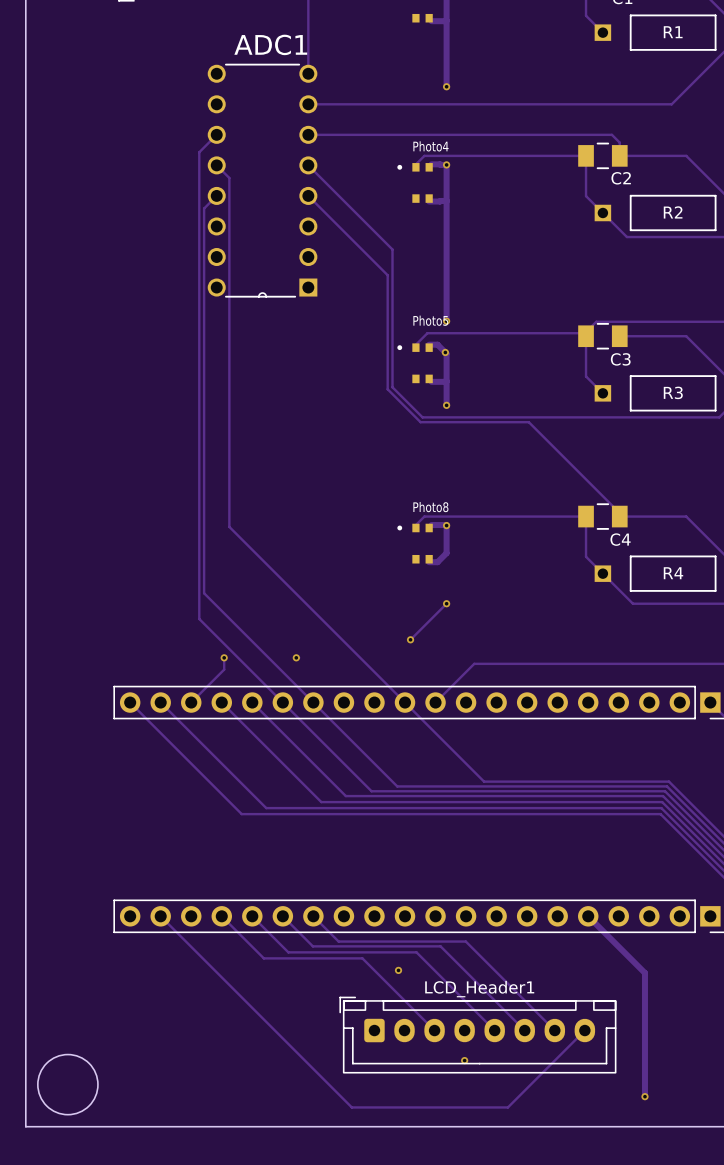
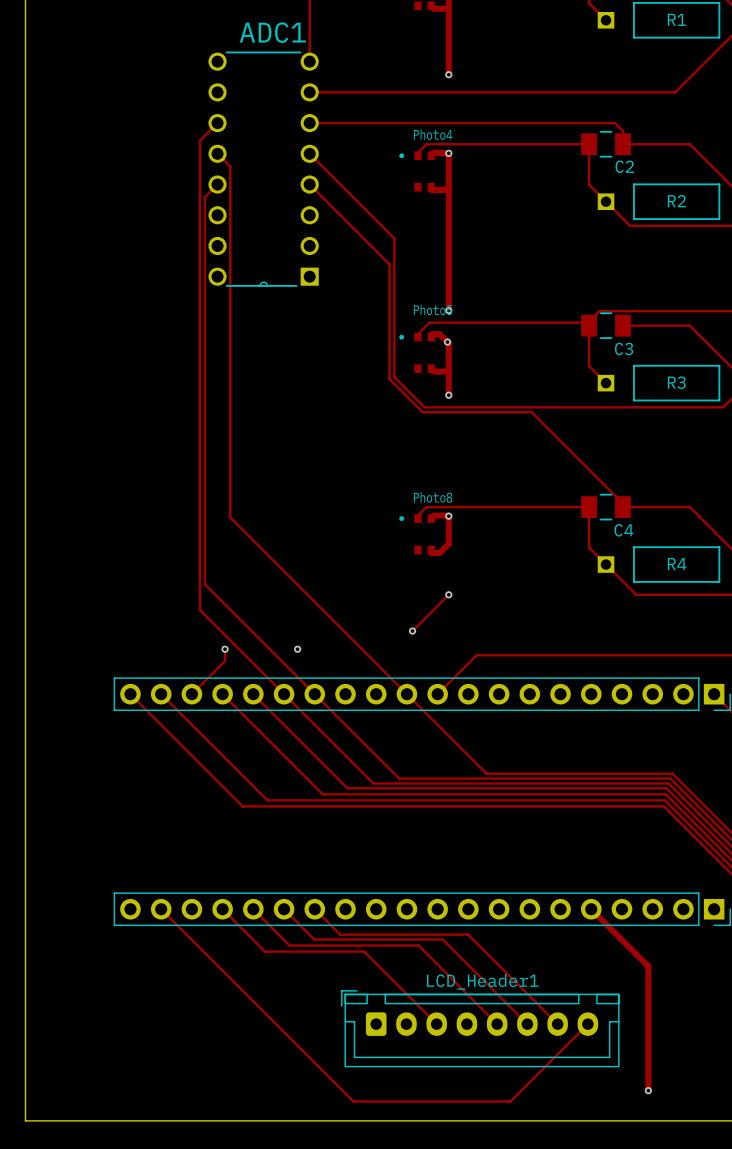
via: (398, 970) -> none
round board edge: [37, 1054, 99, 1115] -> none
via: (464, 1060) -> none

